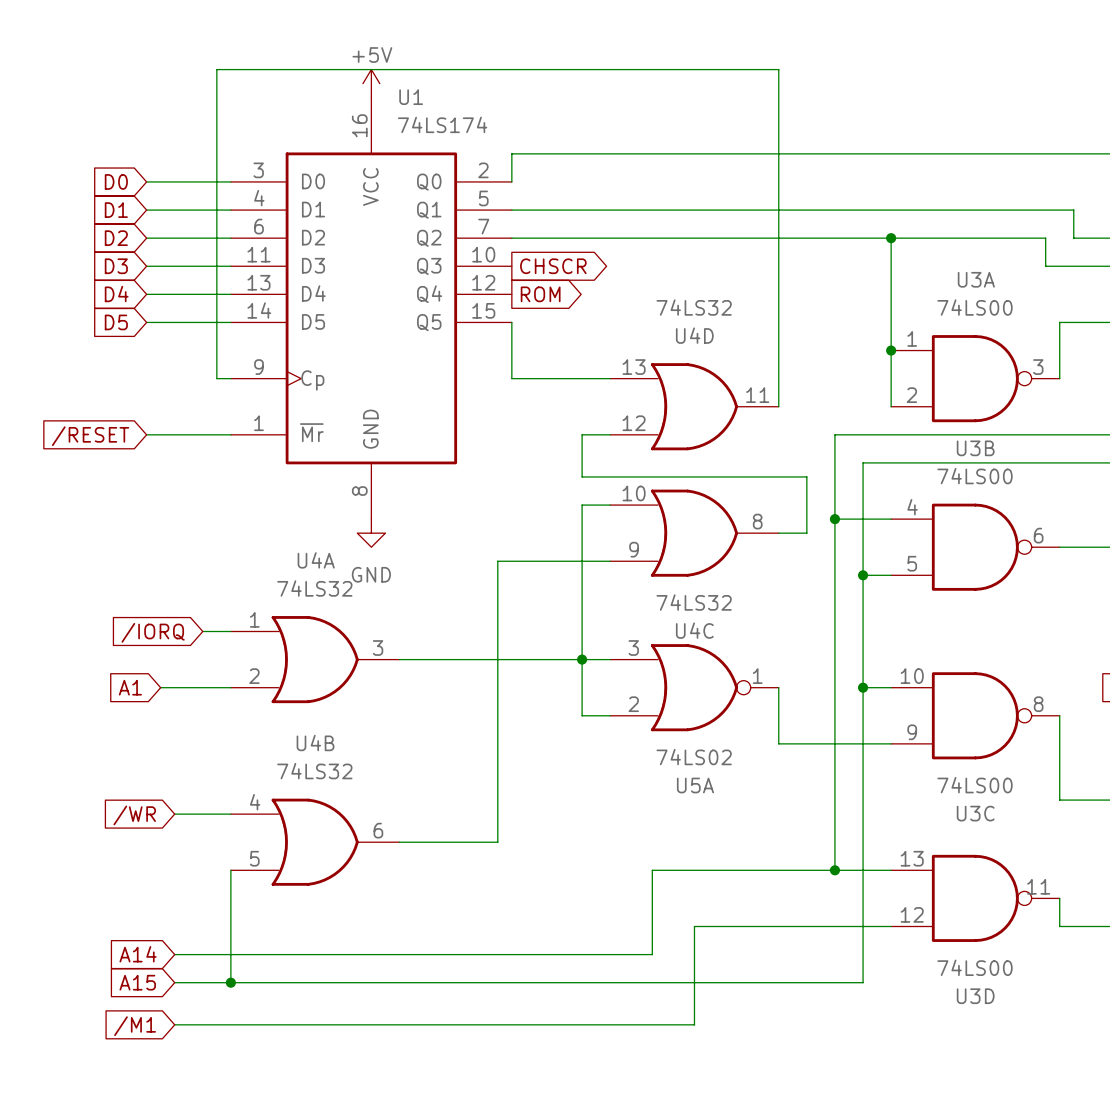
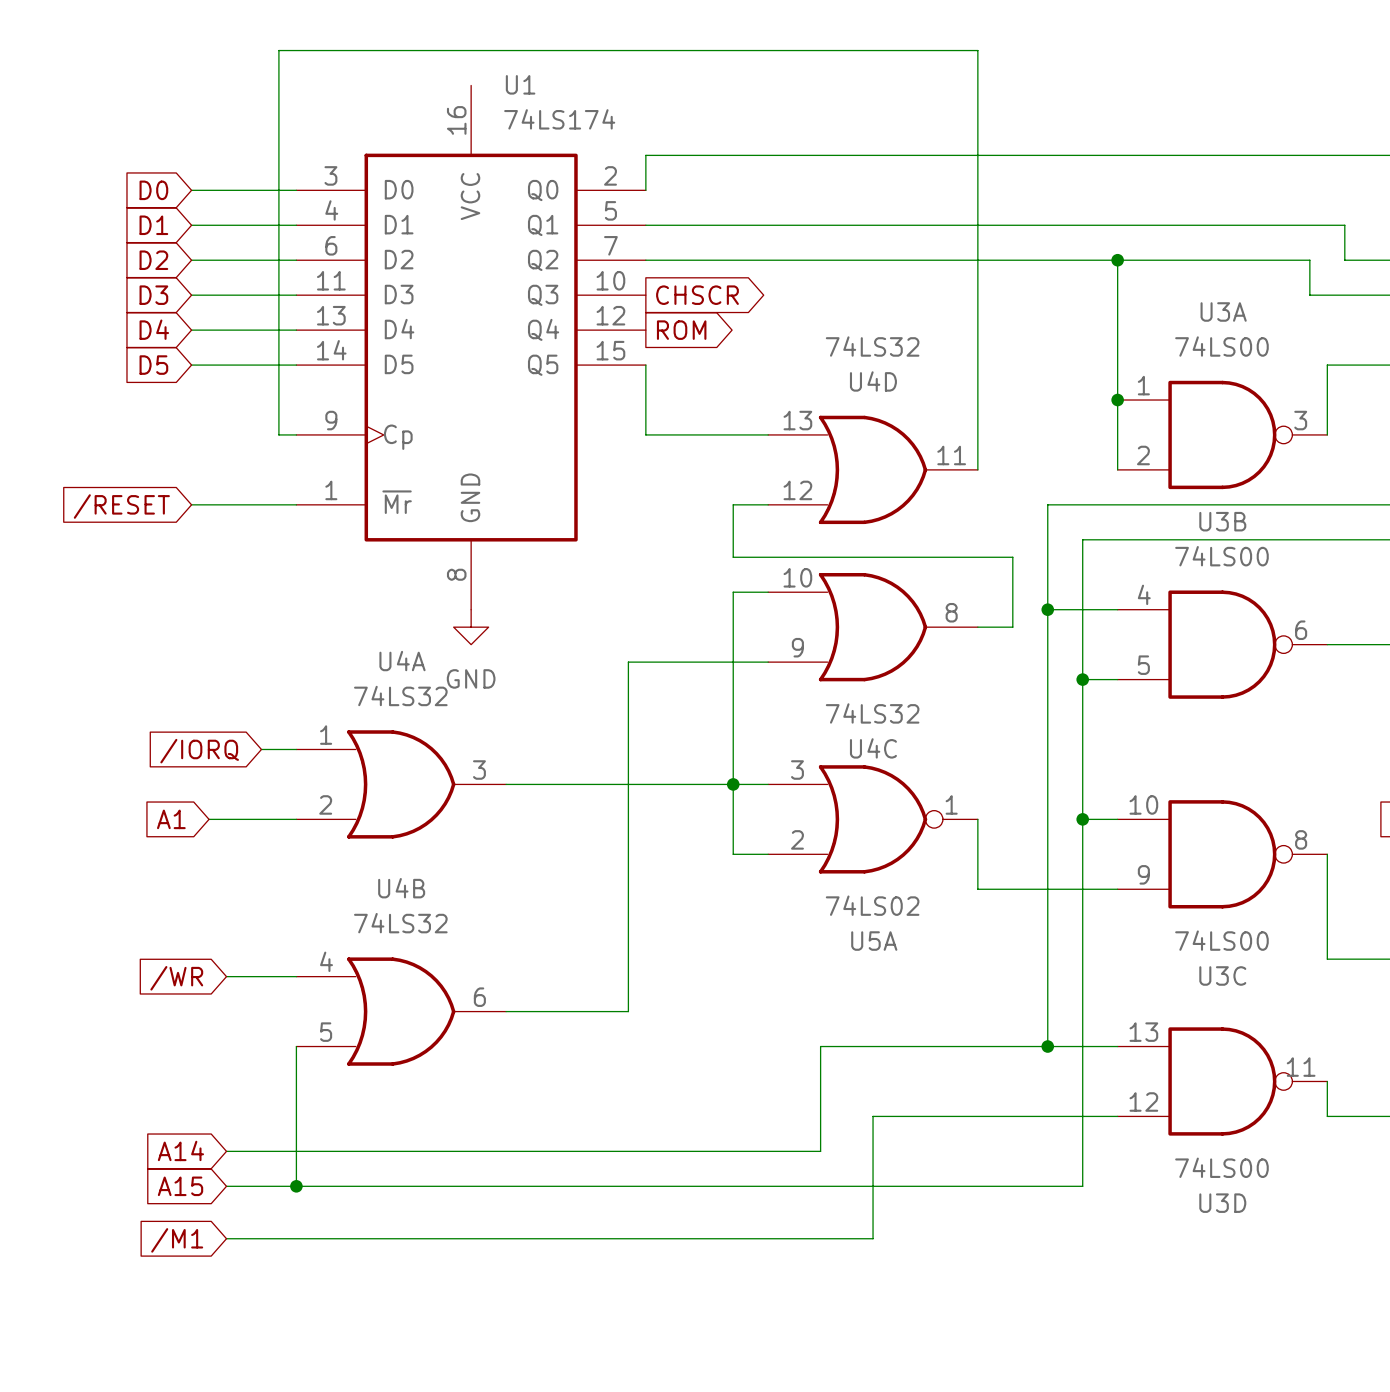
power symbol: +5V (371, 83) -> none

